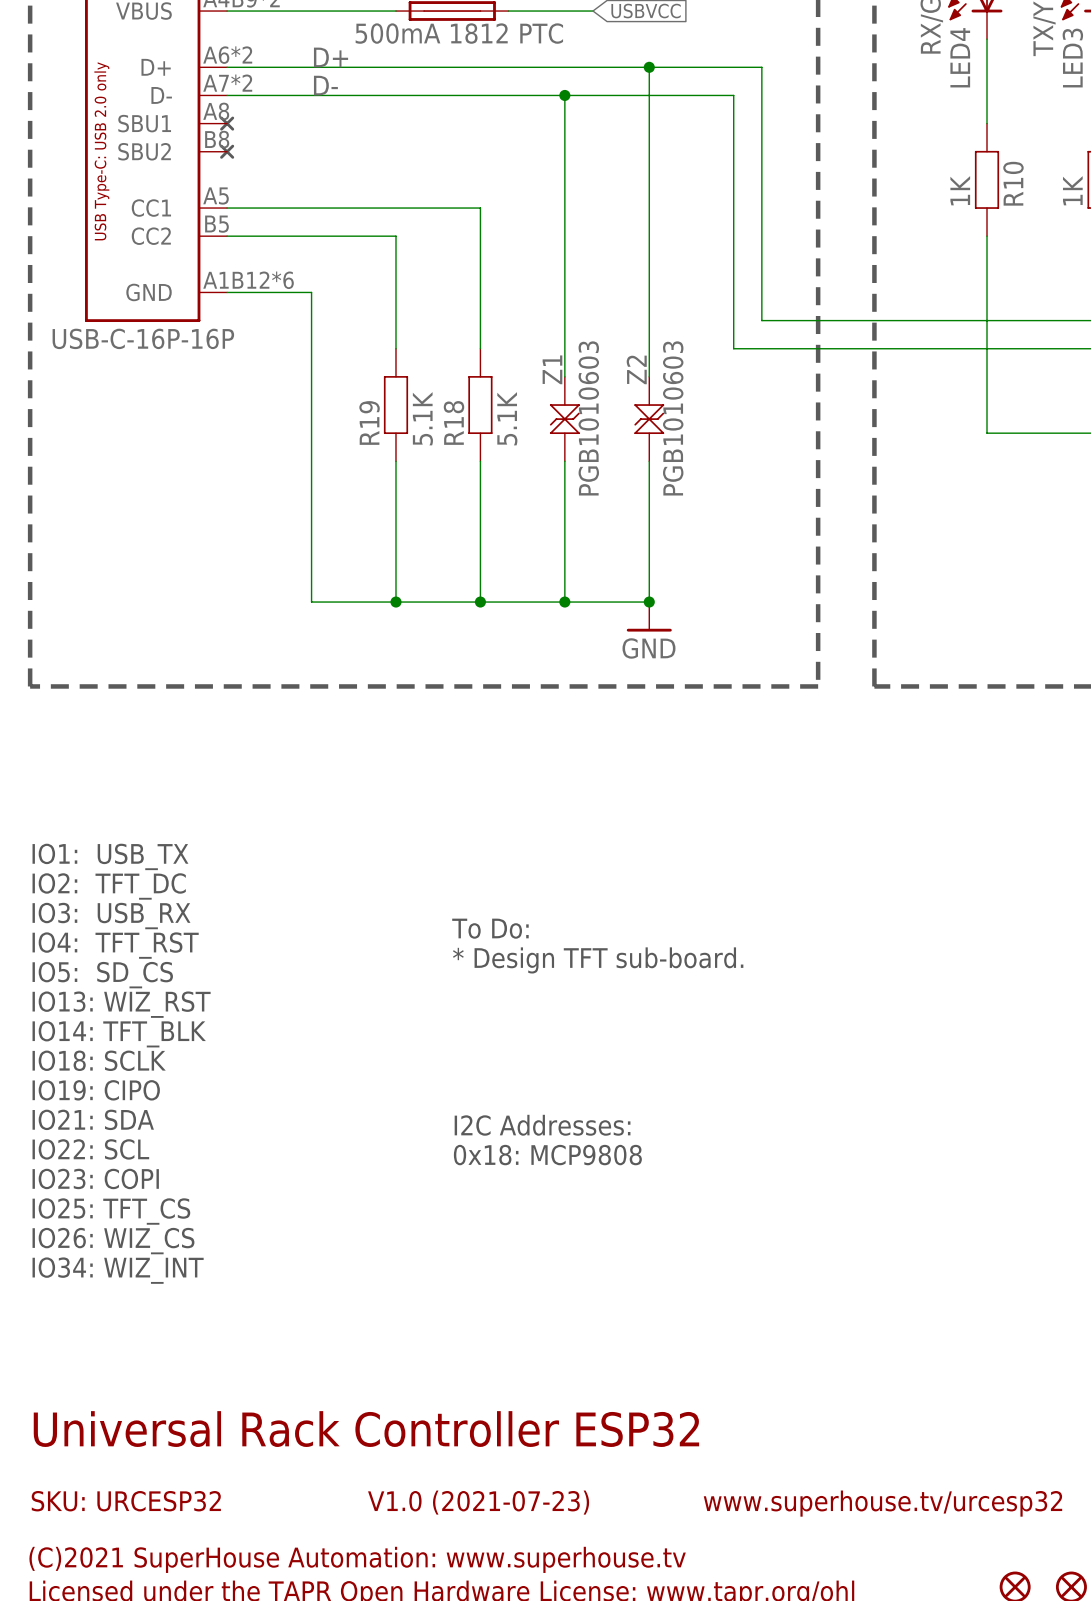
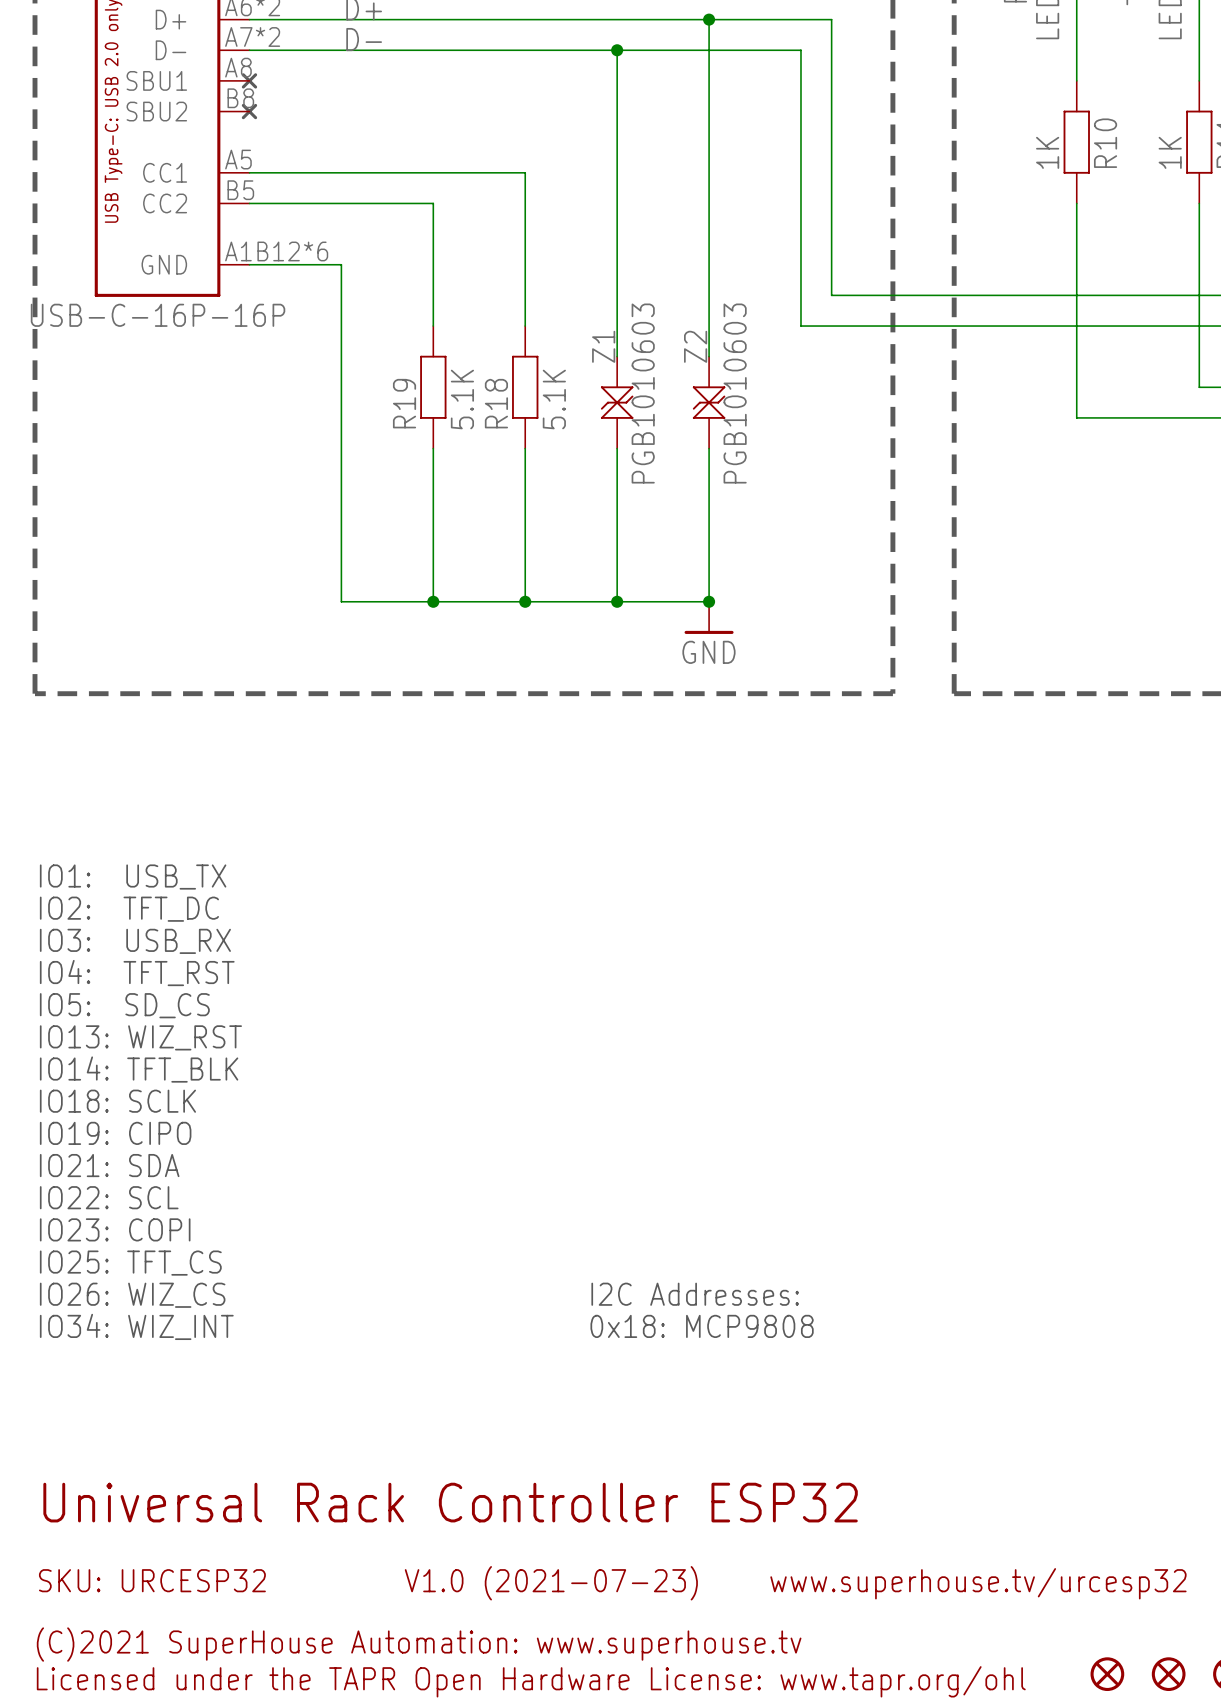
text: To Do: (490, 928) -> none
text: * Design TFT sub-board. (598, 960) -> none
text position: I2C Addresses: (542, 1125) -> I2C Addresses: (695, 1294)
text position: 0x18: MCP9808 (547, 1155) -> 0x18: MCP9808 (702, 1326)

